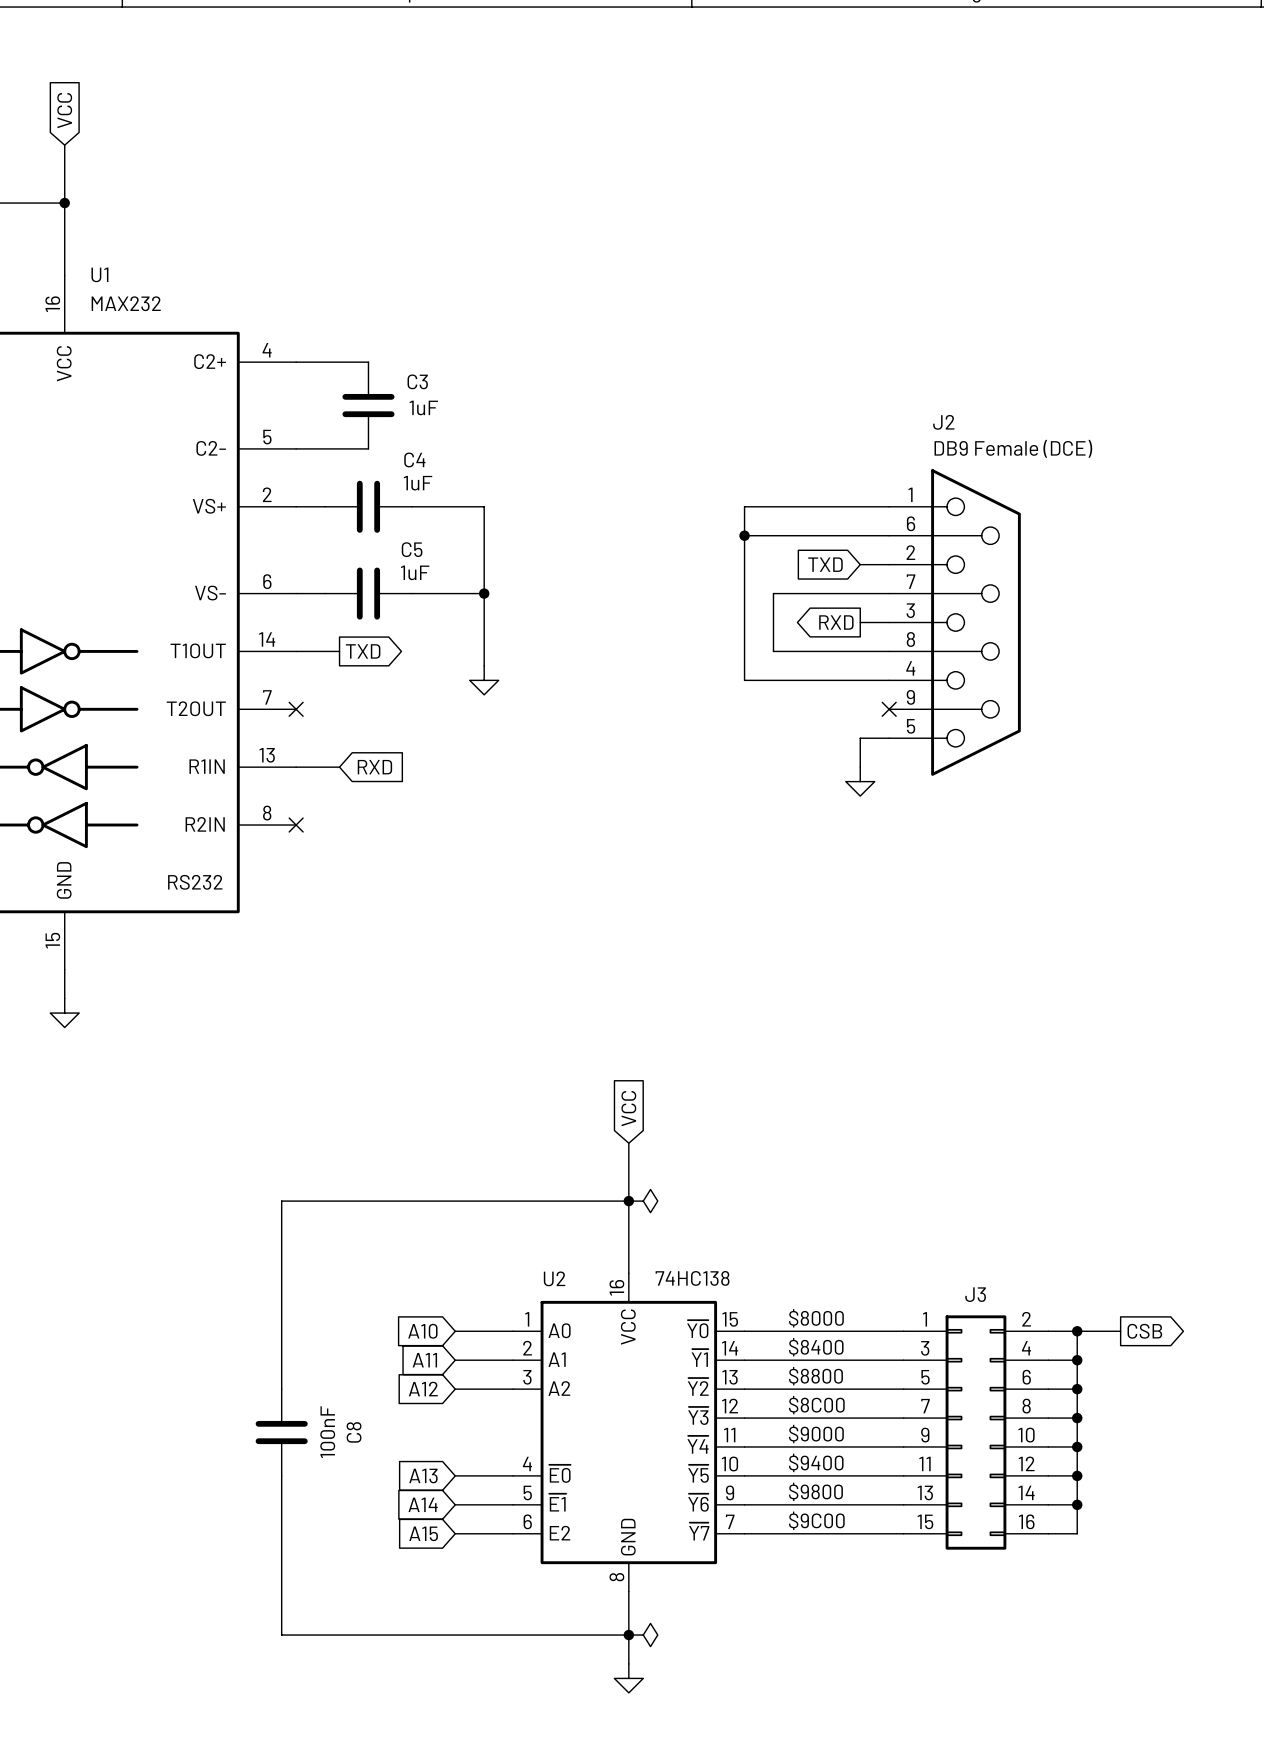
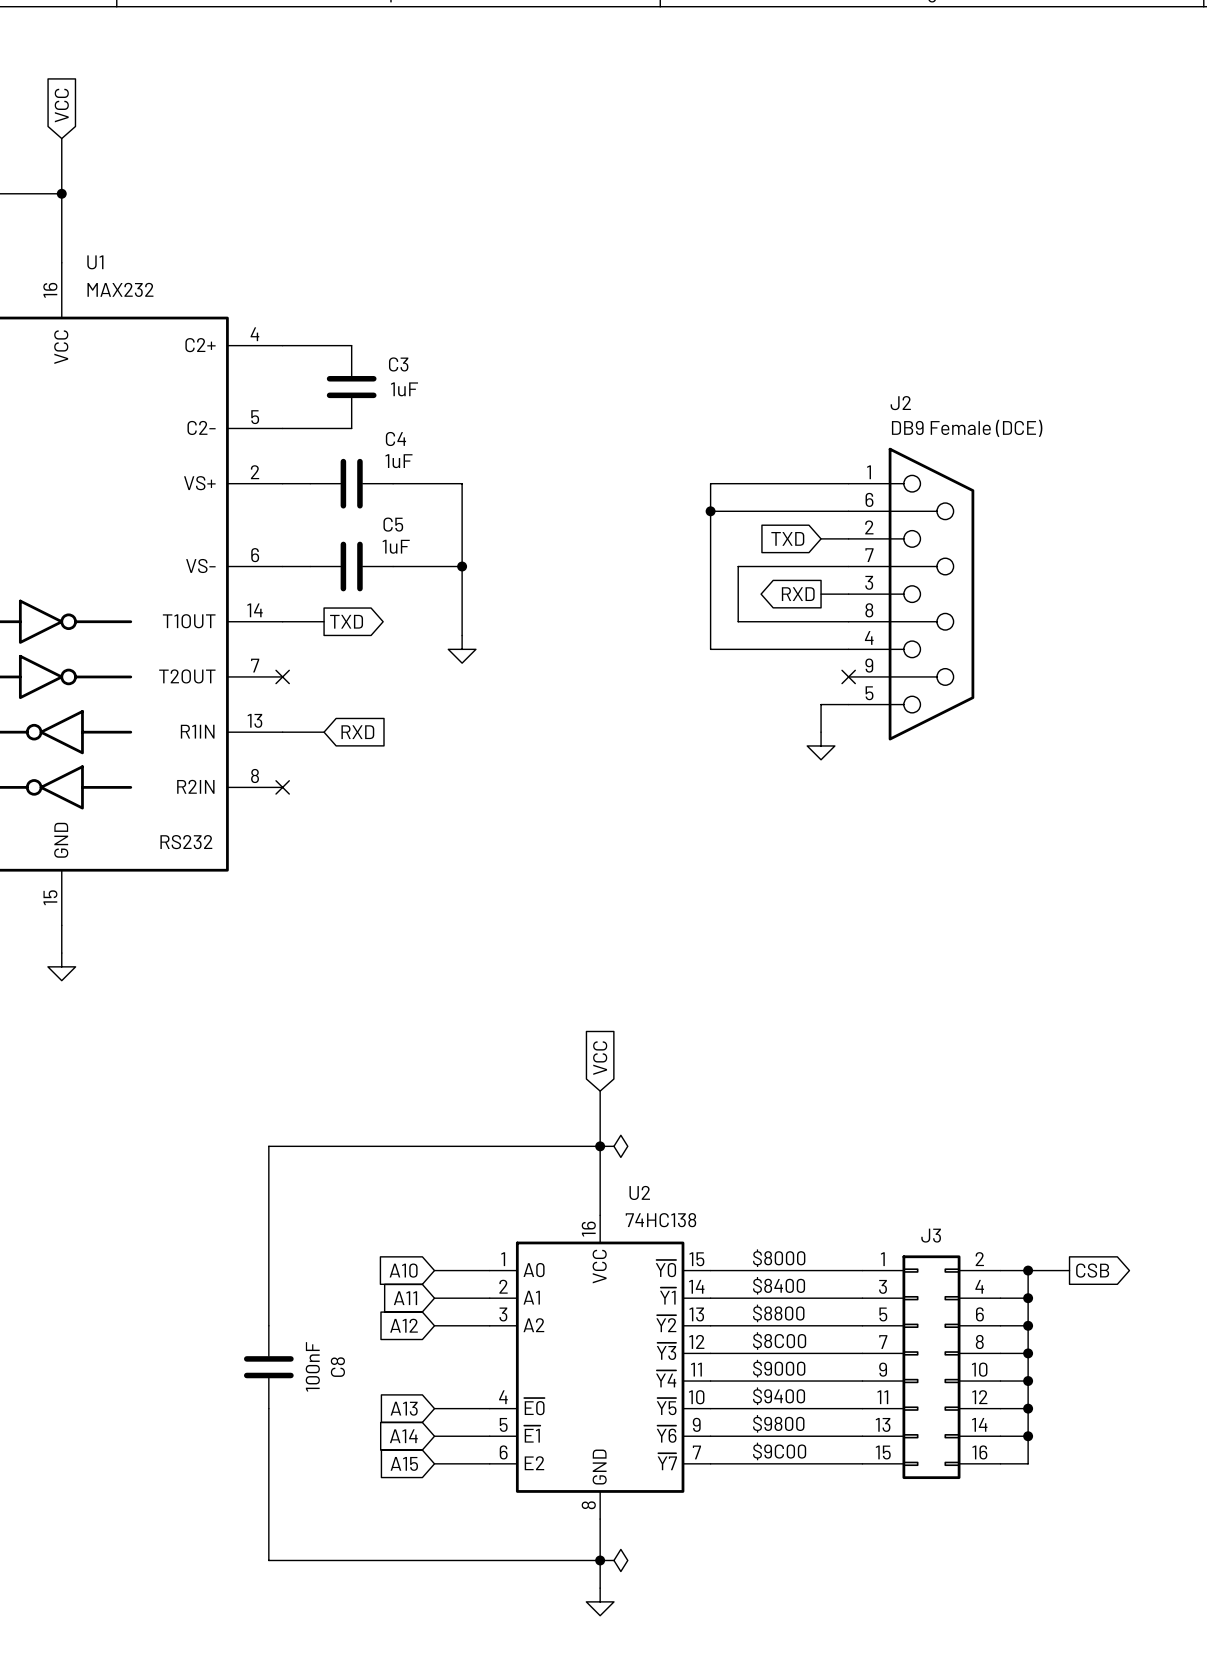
U2 name position: U2 (554, 1278) -> U2 (639, 1192)

